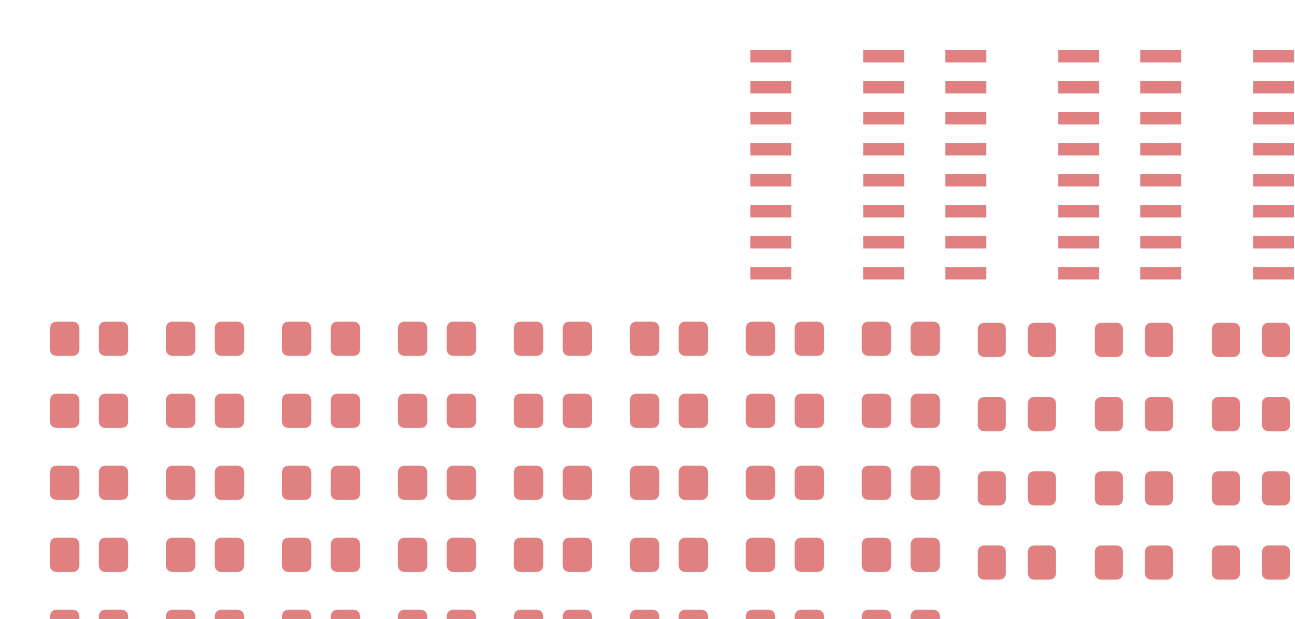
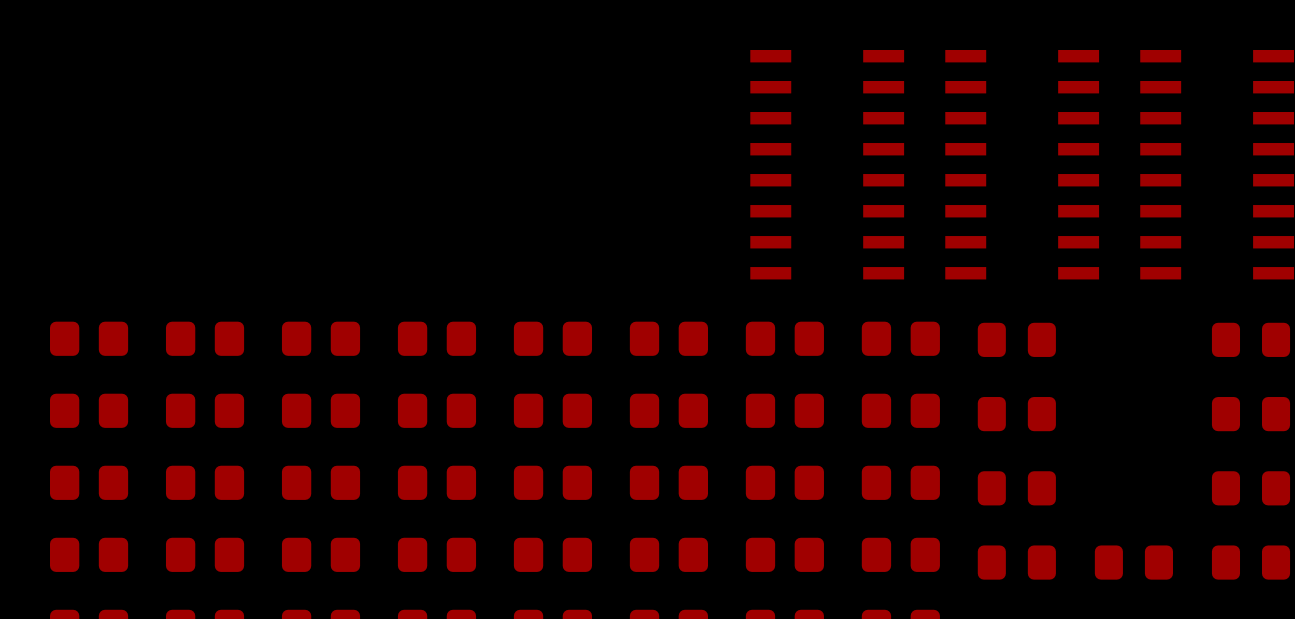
part: (1133, 339) -> none
part: (1133, 414) -> none
part: (1133, 488) -> none

